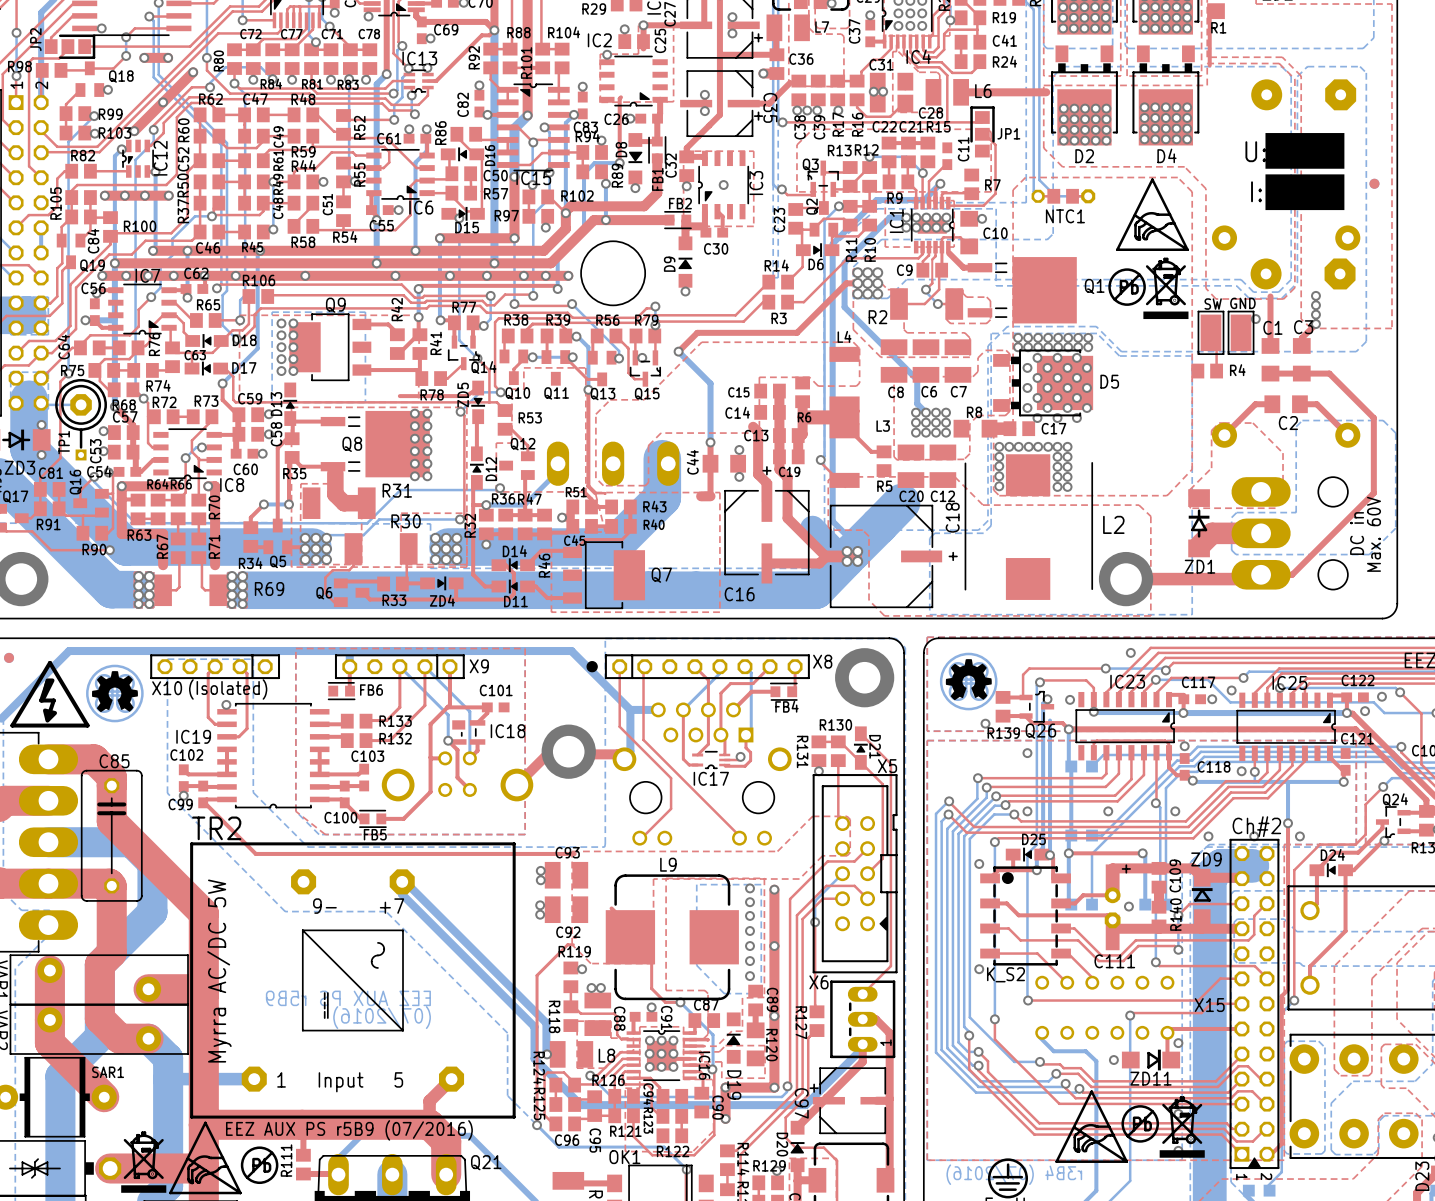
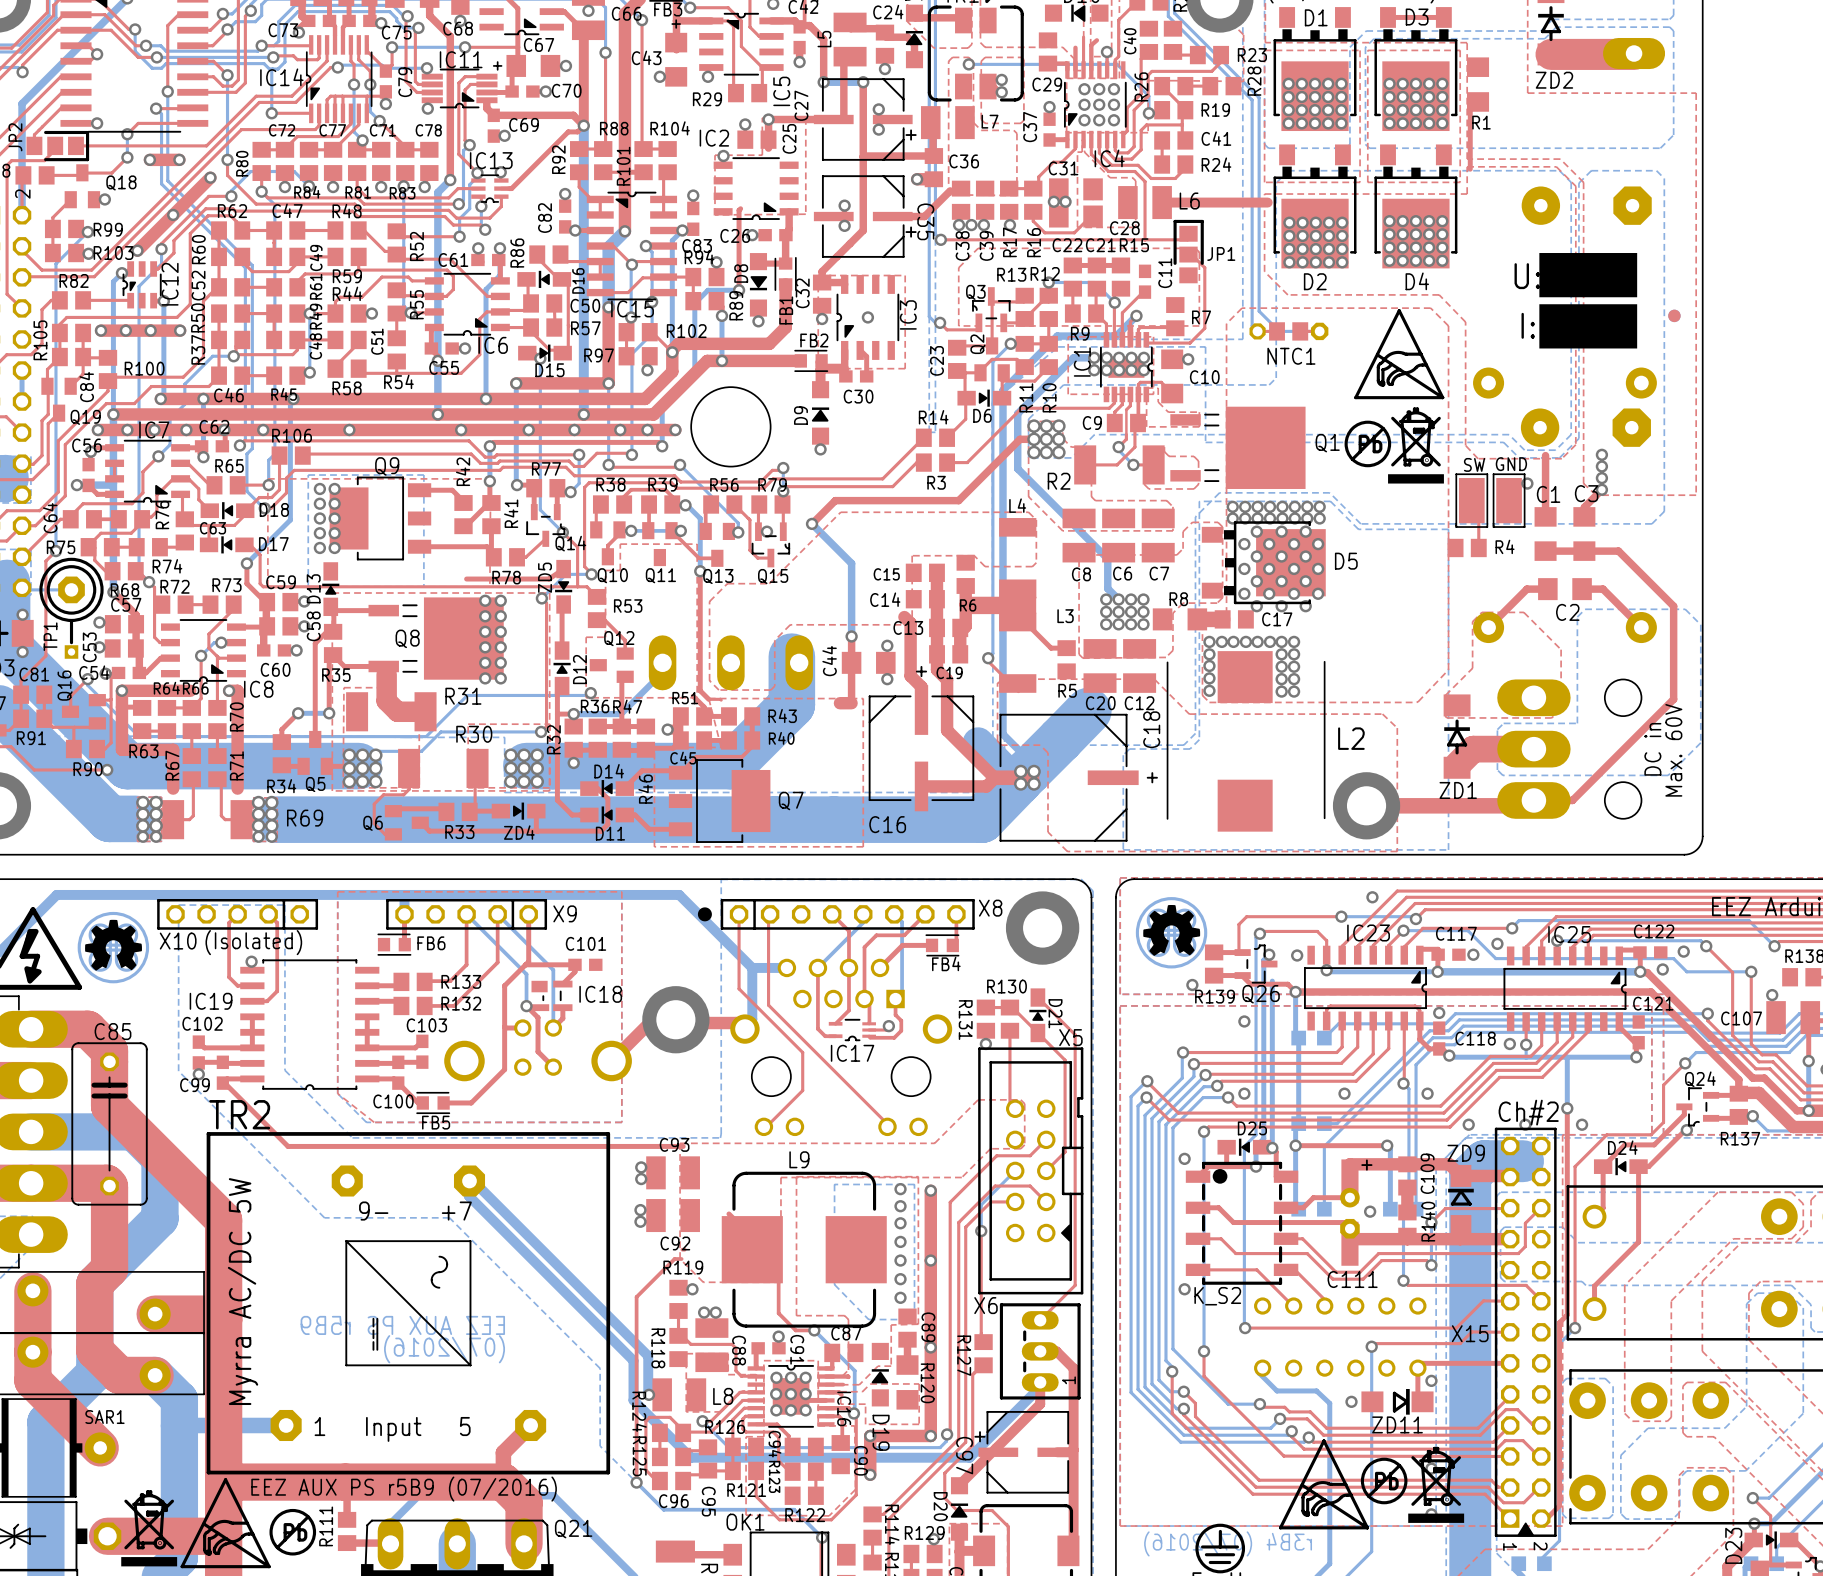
top zone outline: none -> (1146, 388) (1158, 388) (1158, 402) (1168, 412) (1199, 412) (1199, 426) (1146, 426) (1146, 388)
top track: (949, 253) (963, 267) (979, 267) -> none

